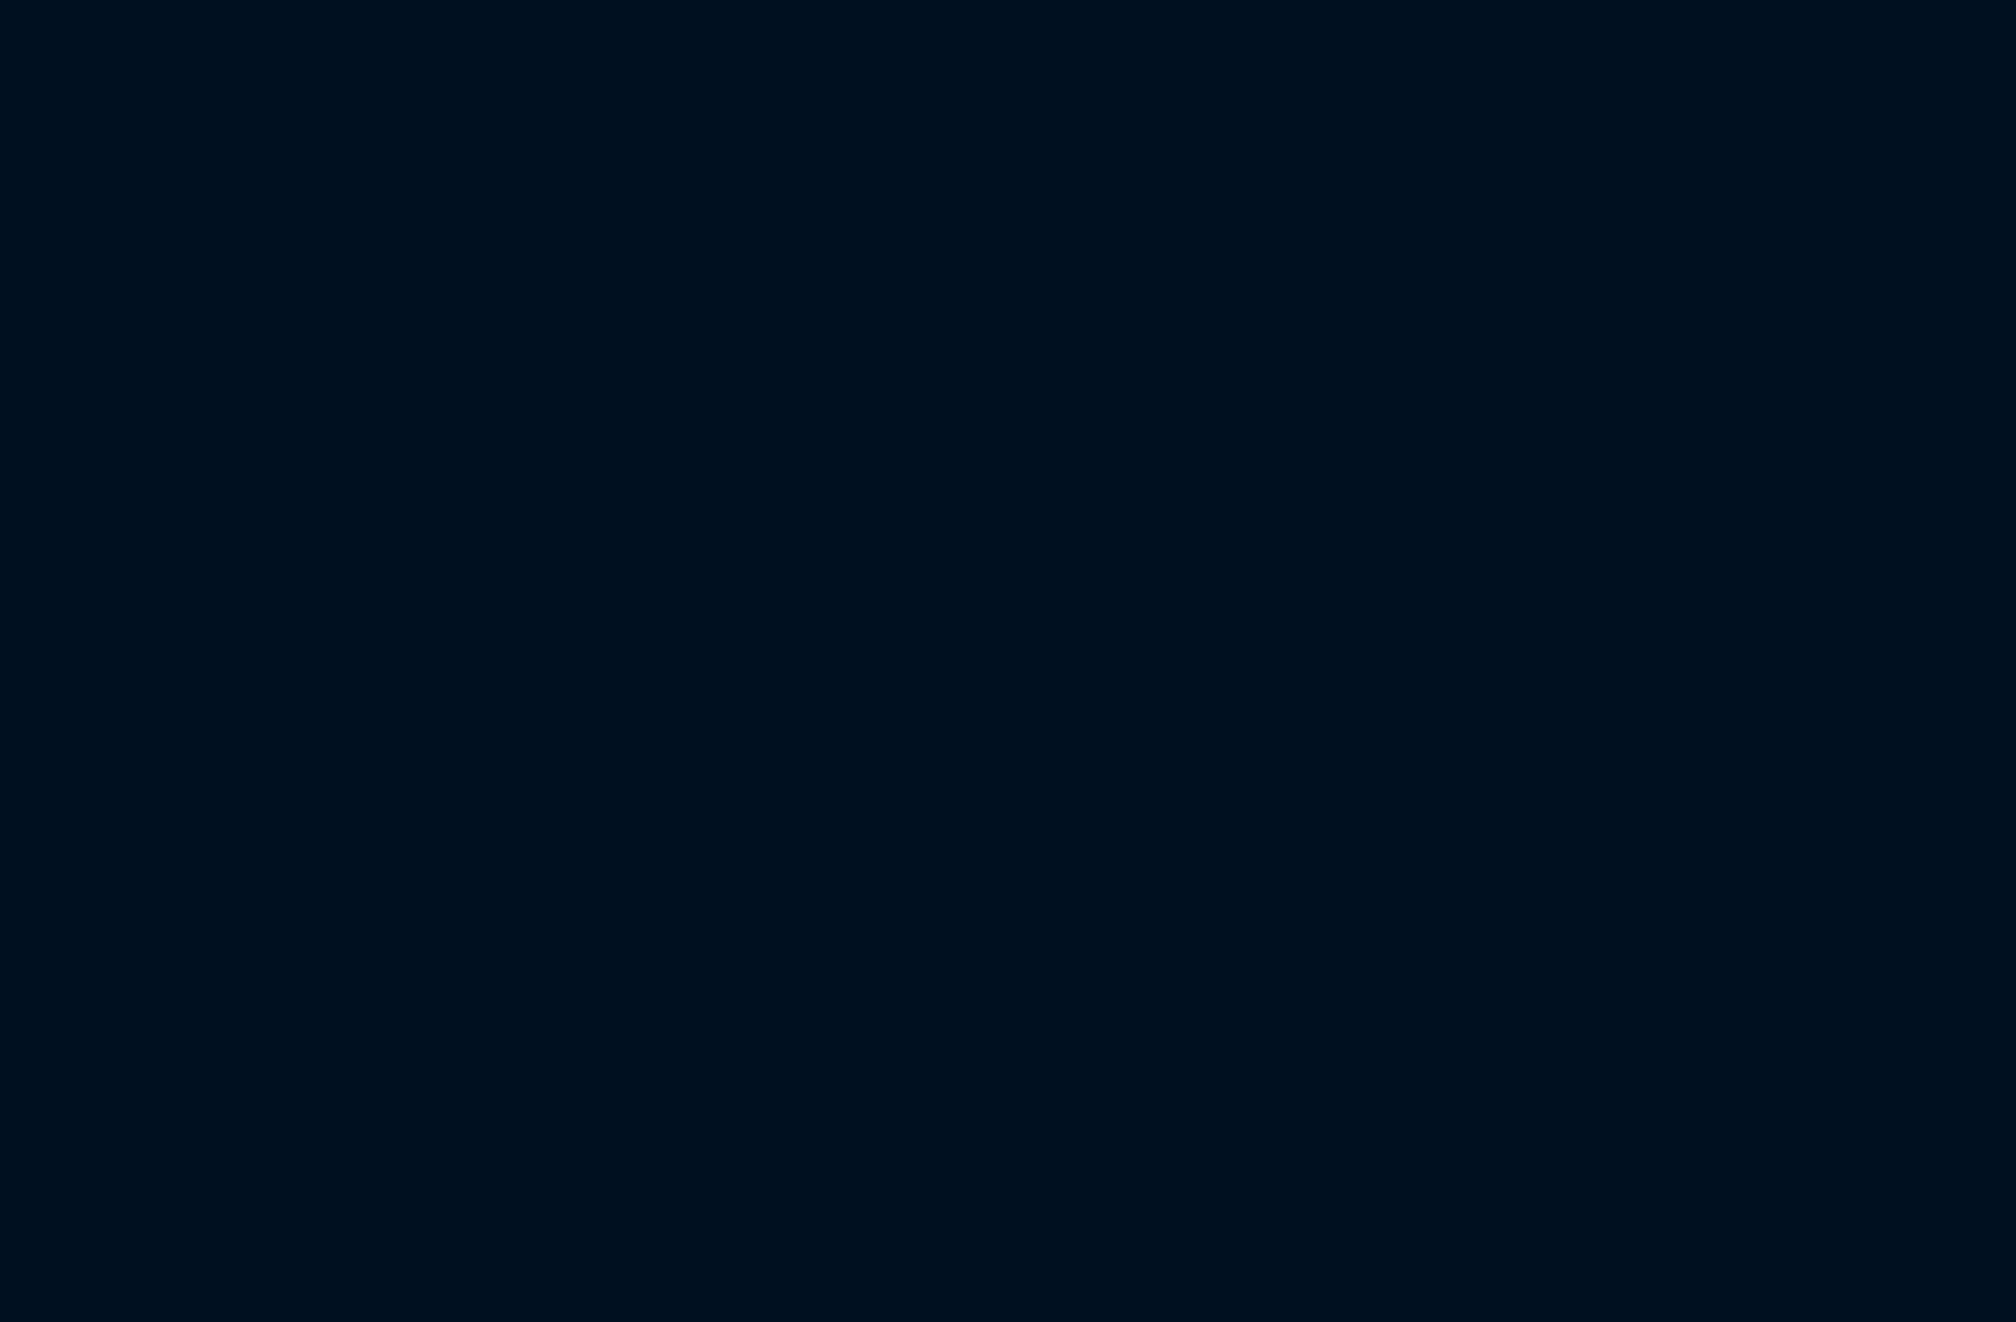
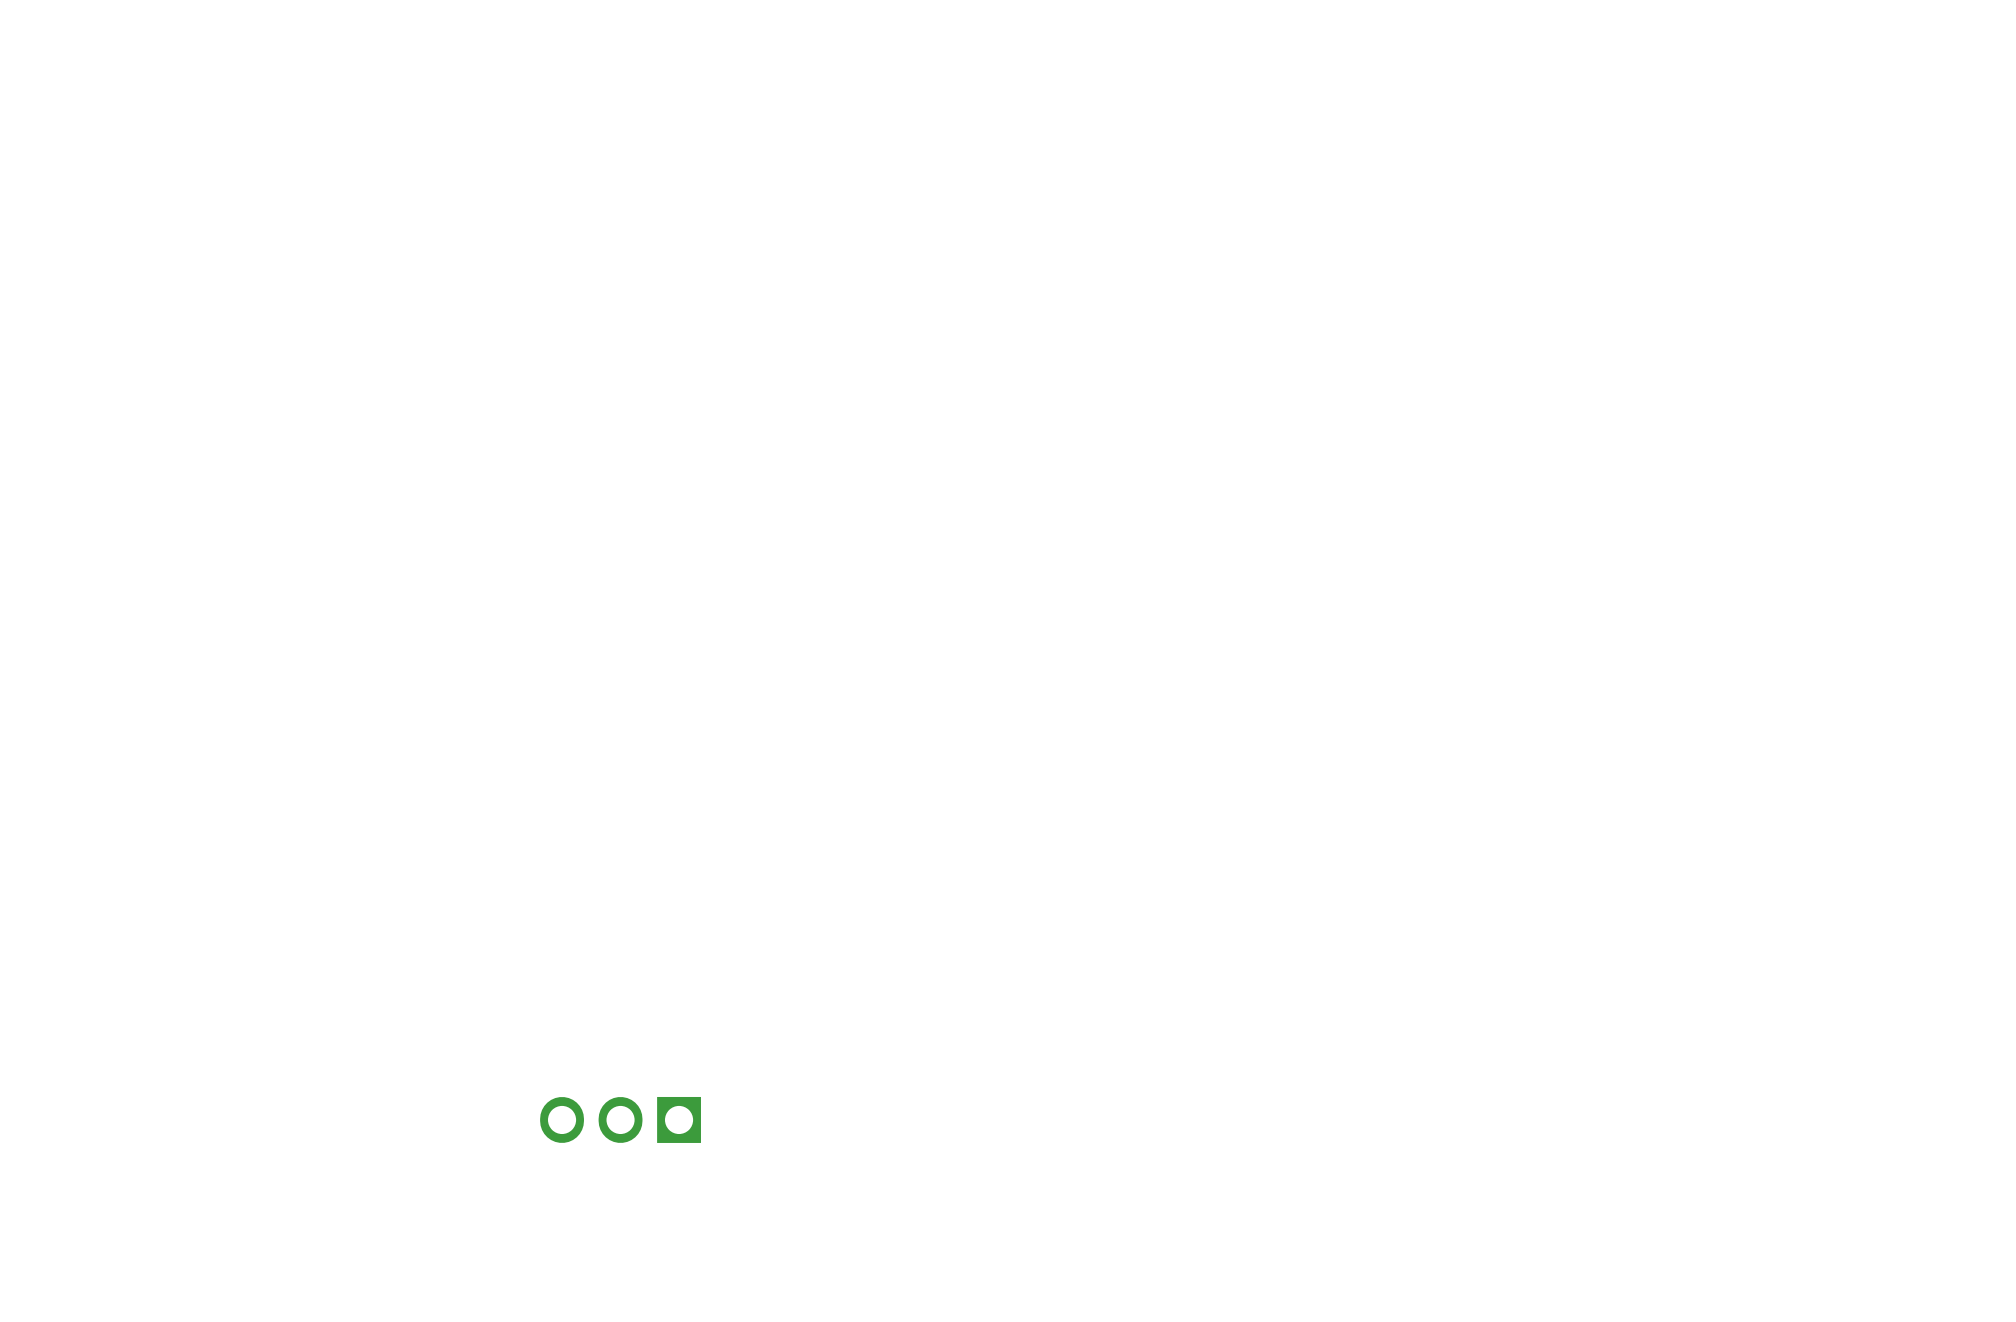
part: none -> (620, 1119)

